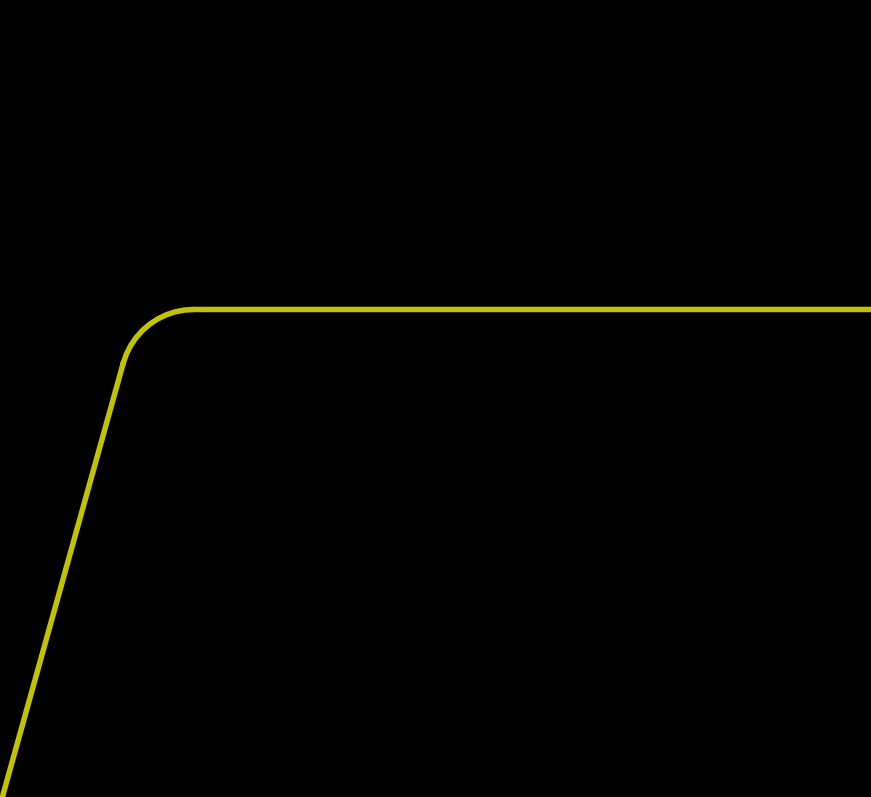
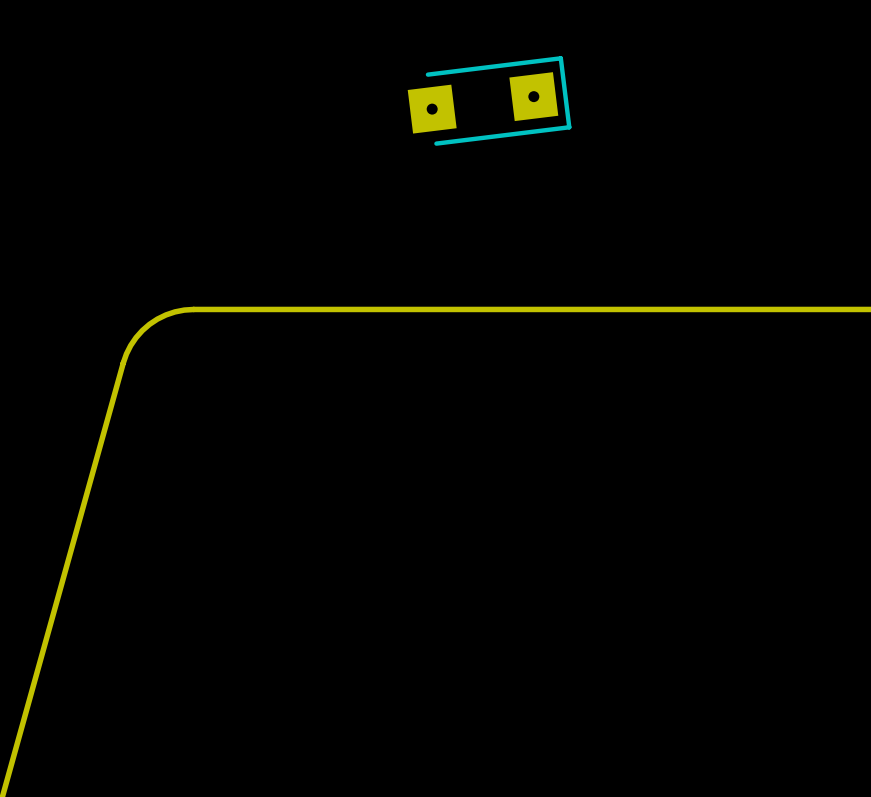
part: none -> (489, 100)

